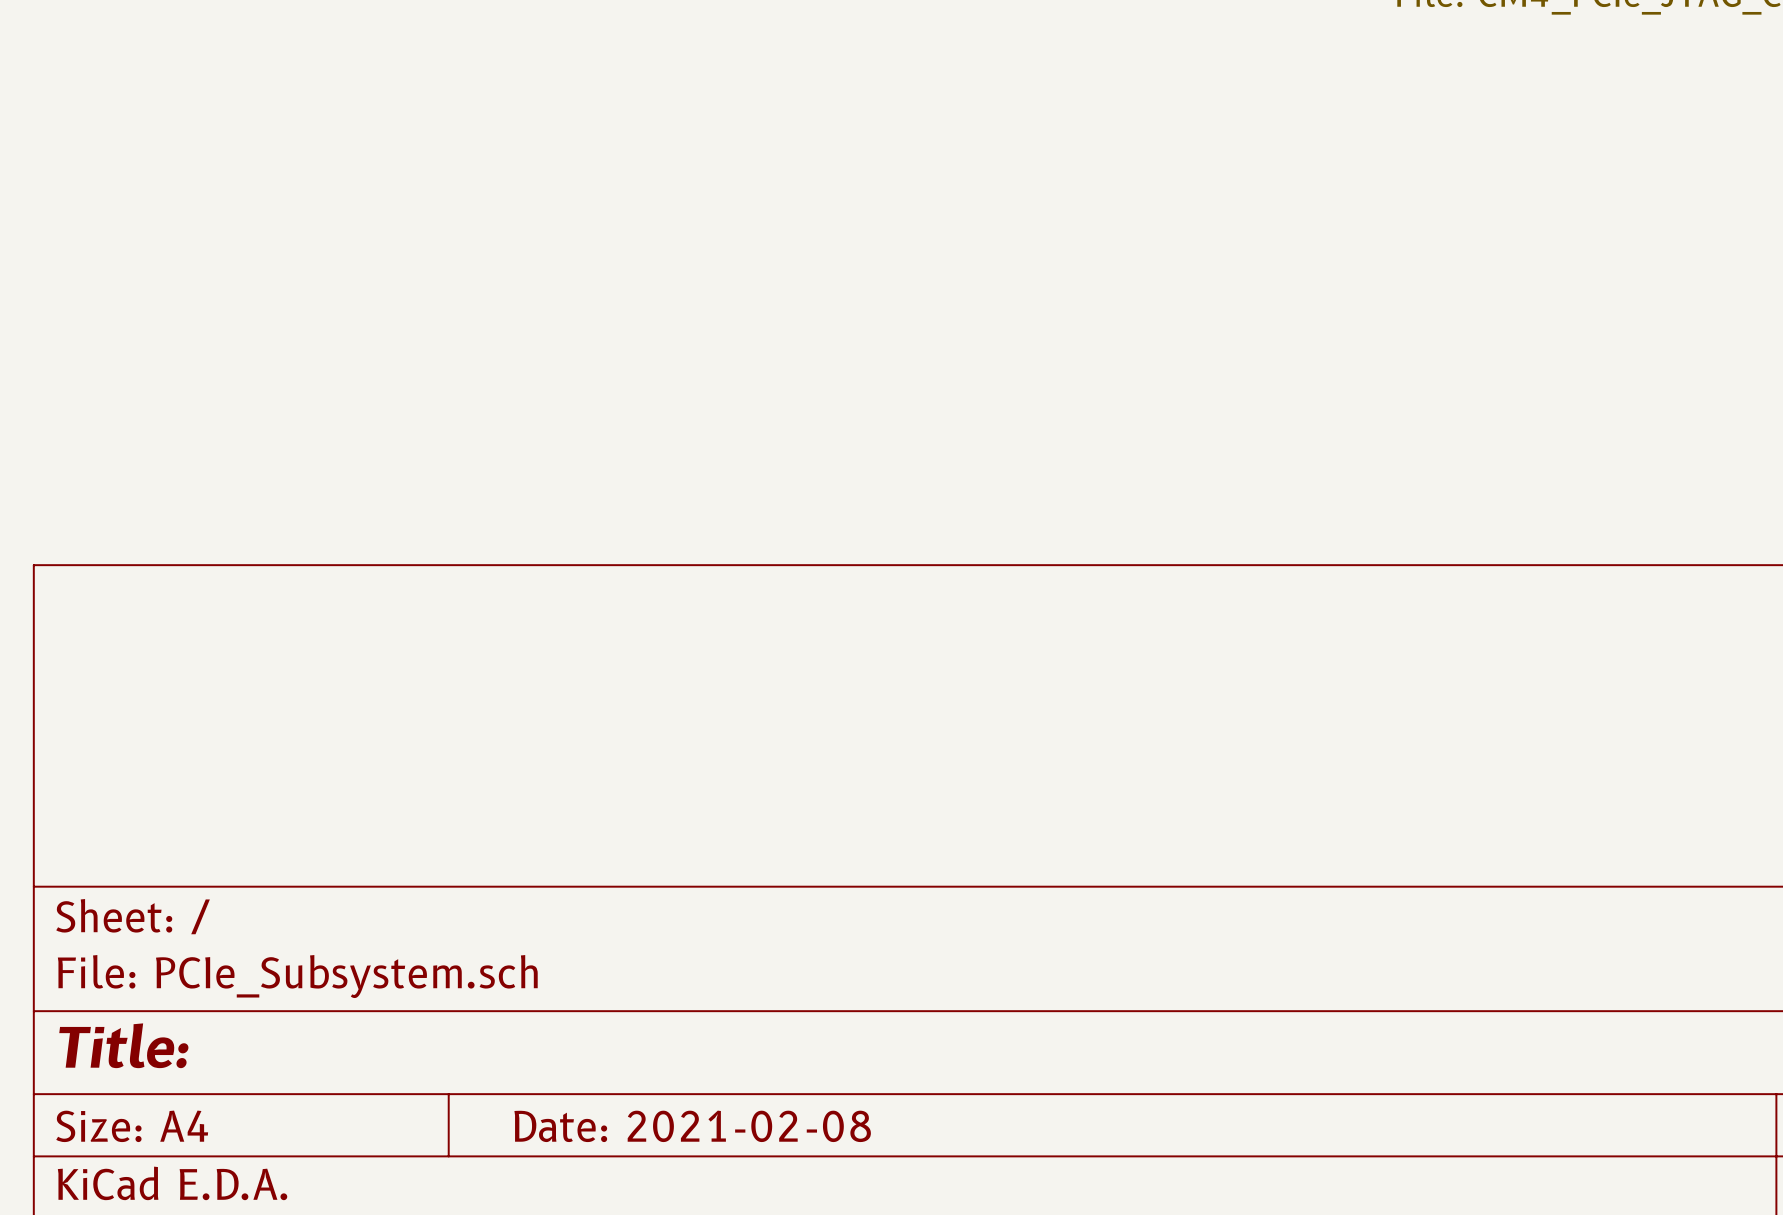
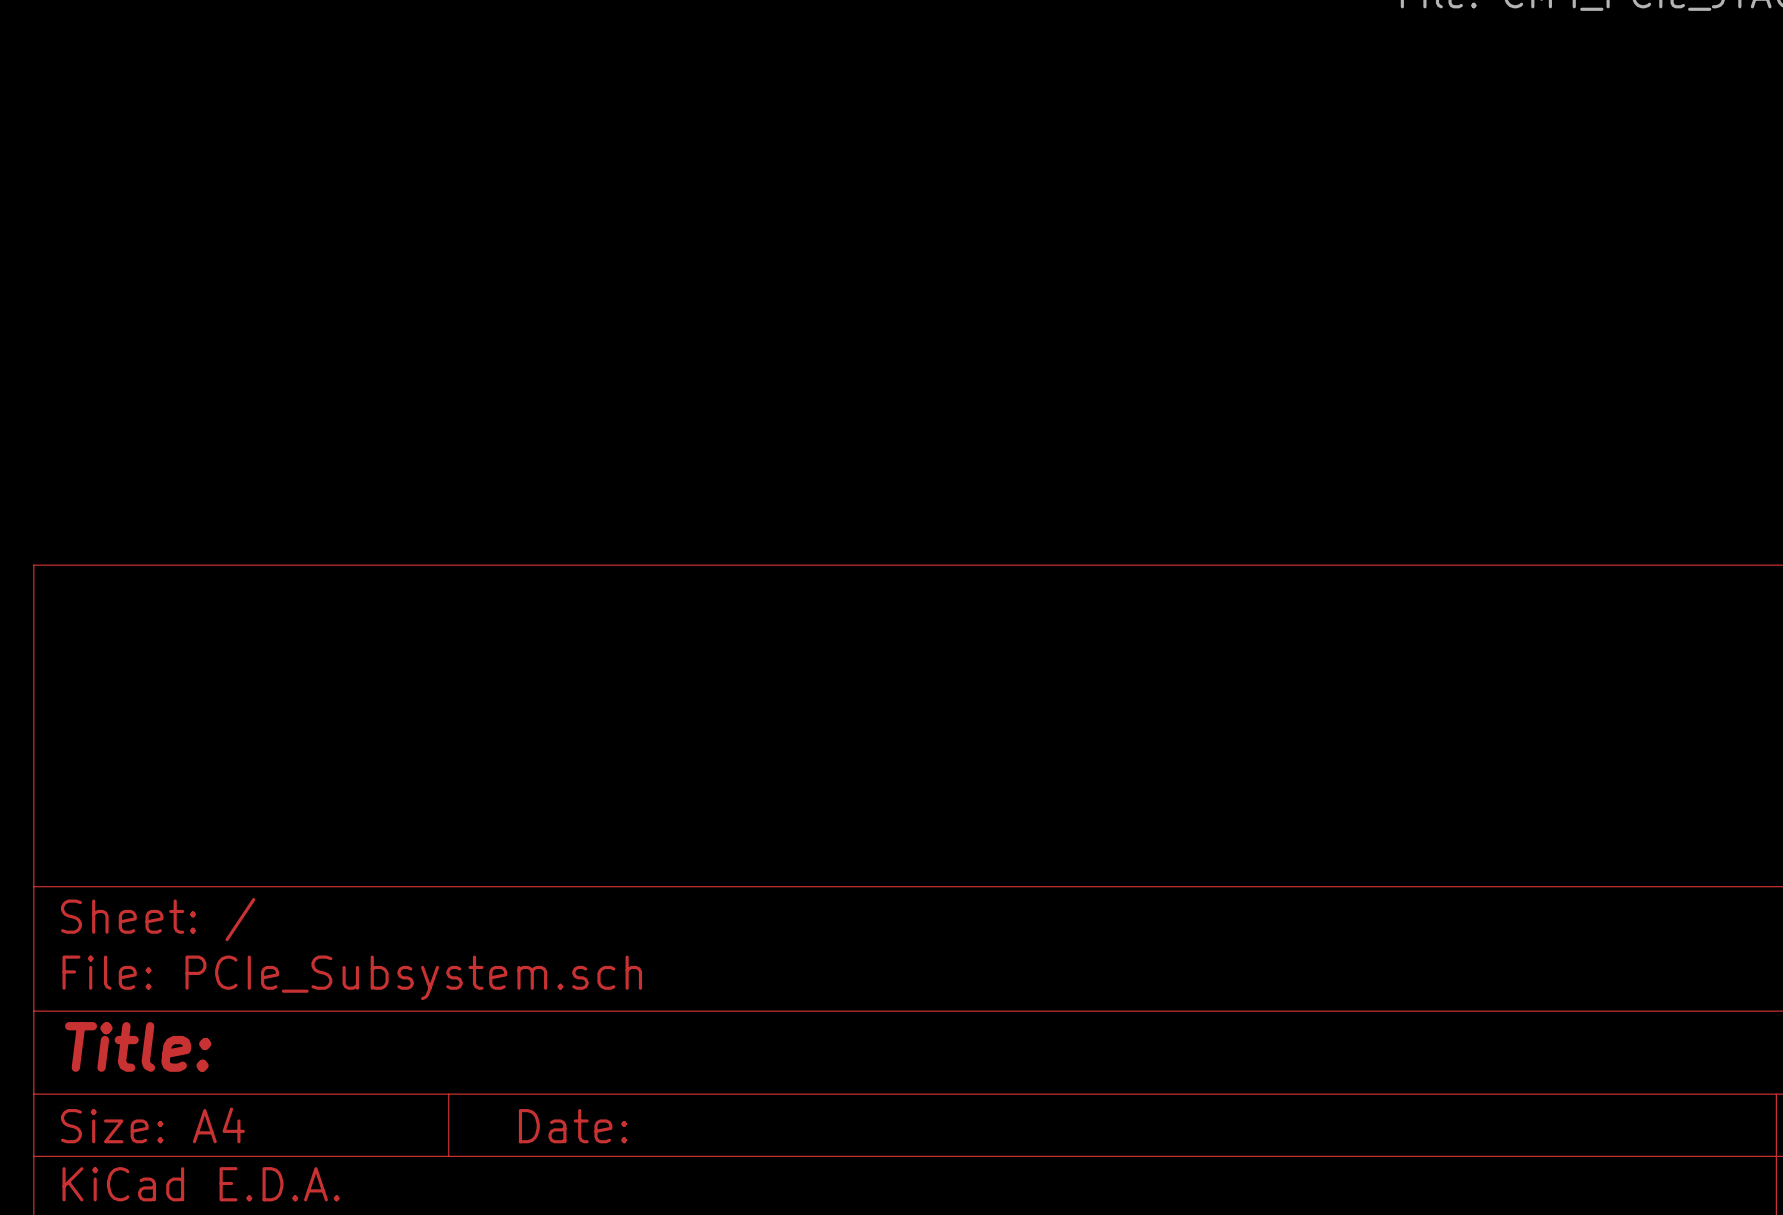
title block: Date: 2021-02-08 (692, 1126) -> Date: (573, 1126)

